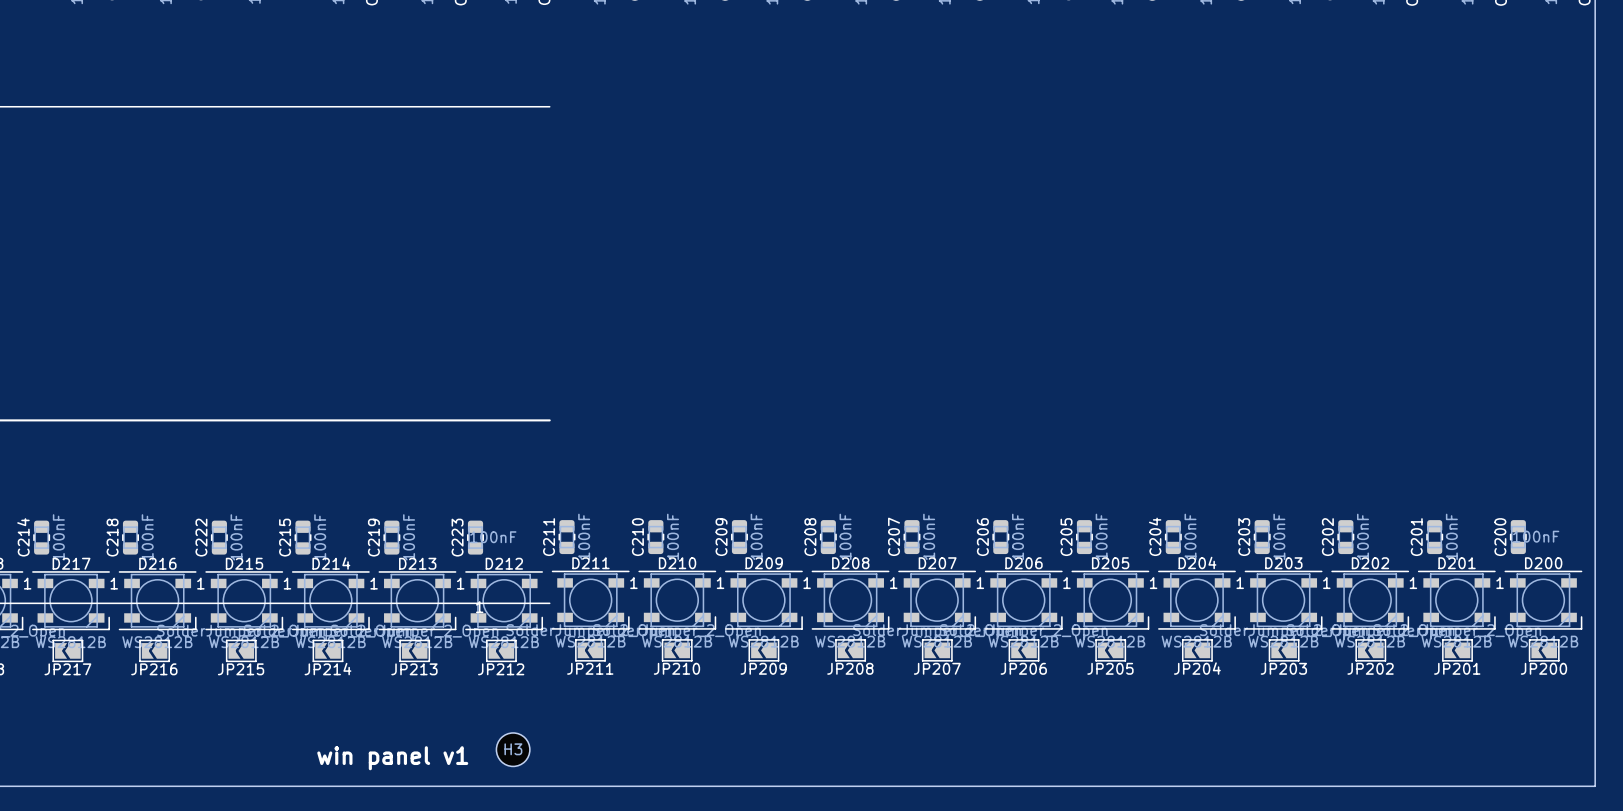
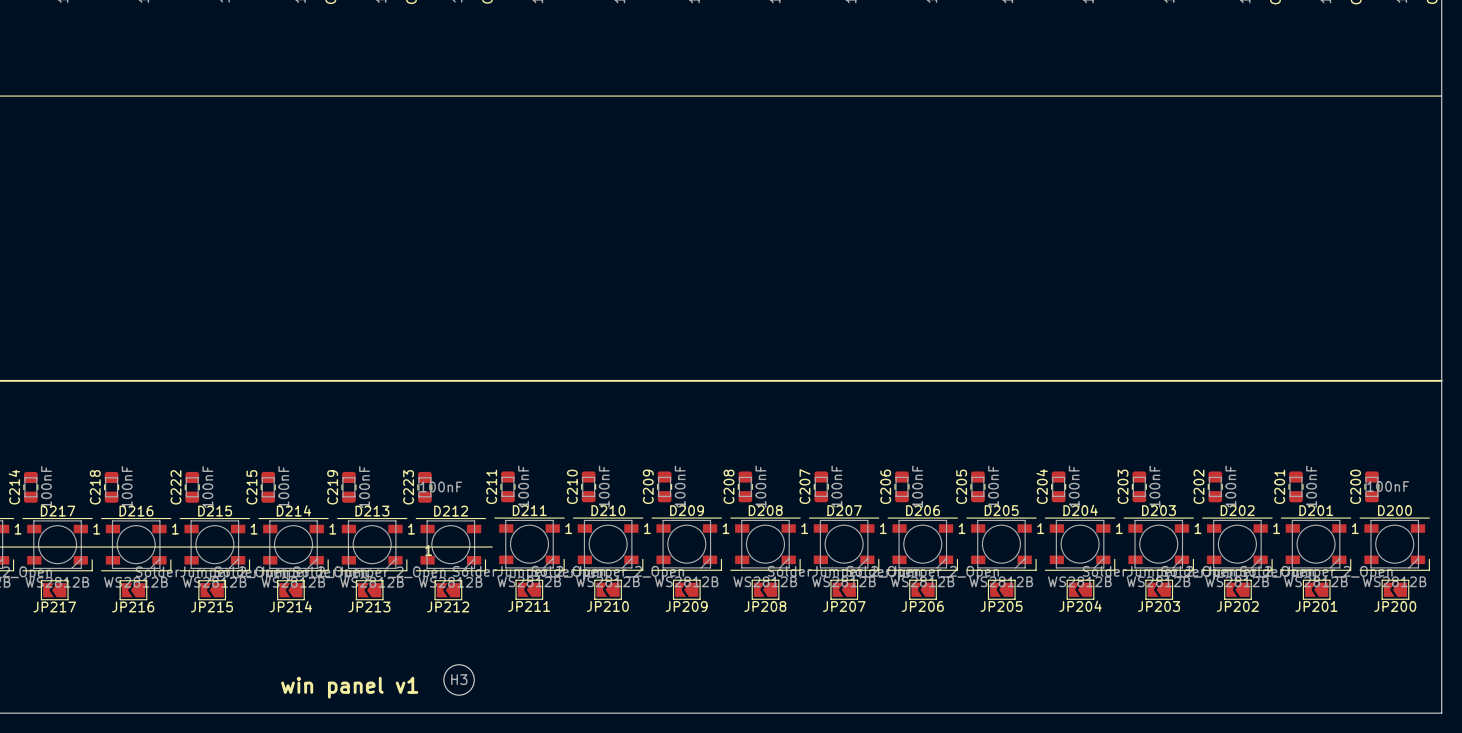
line: none -> (492, 96) (1441, 96)
line: none -> (492, 380) (1441, 380)

